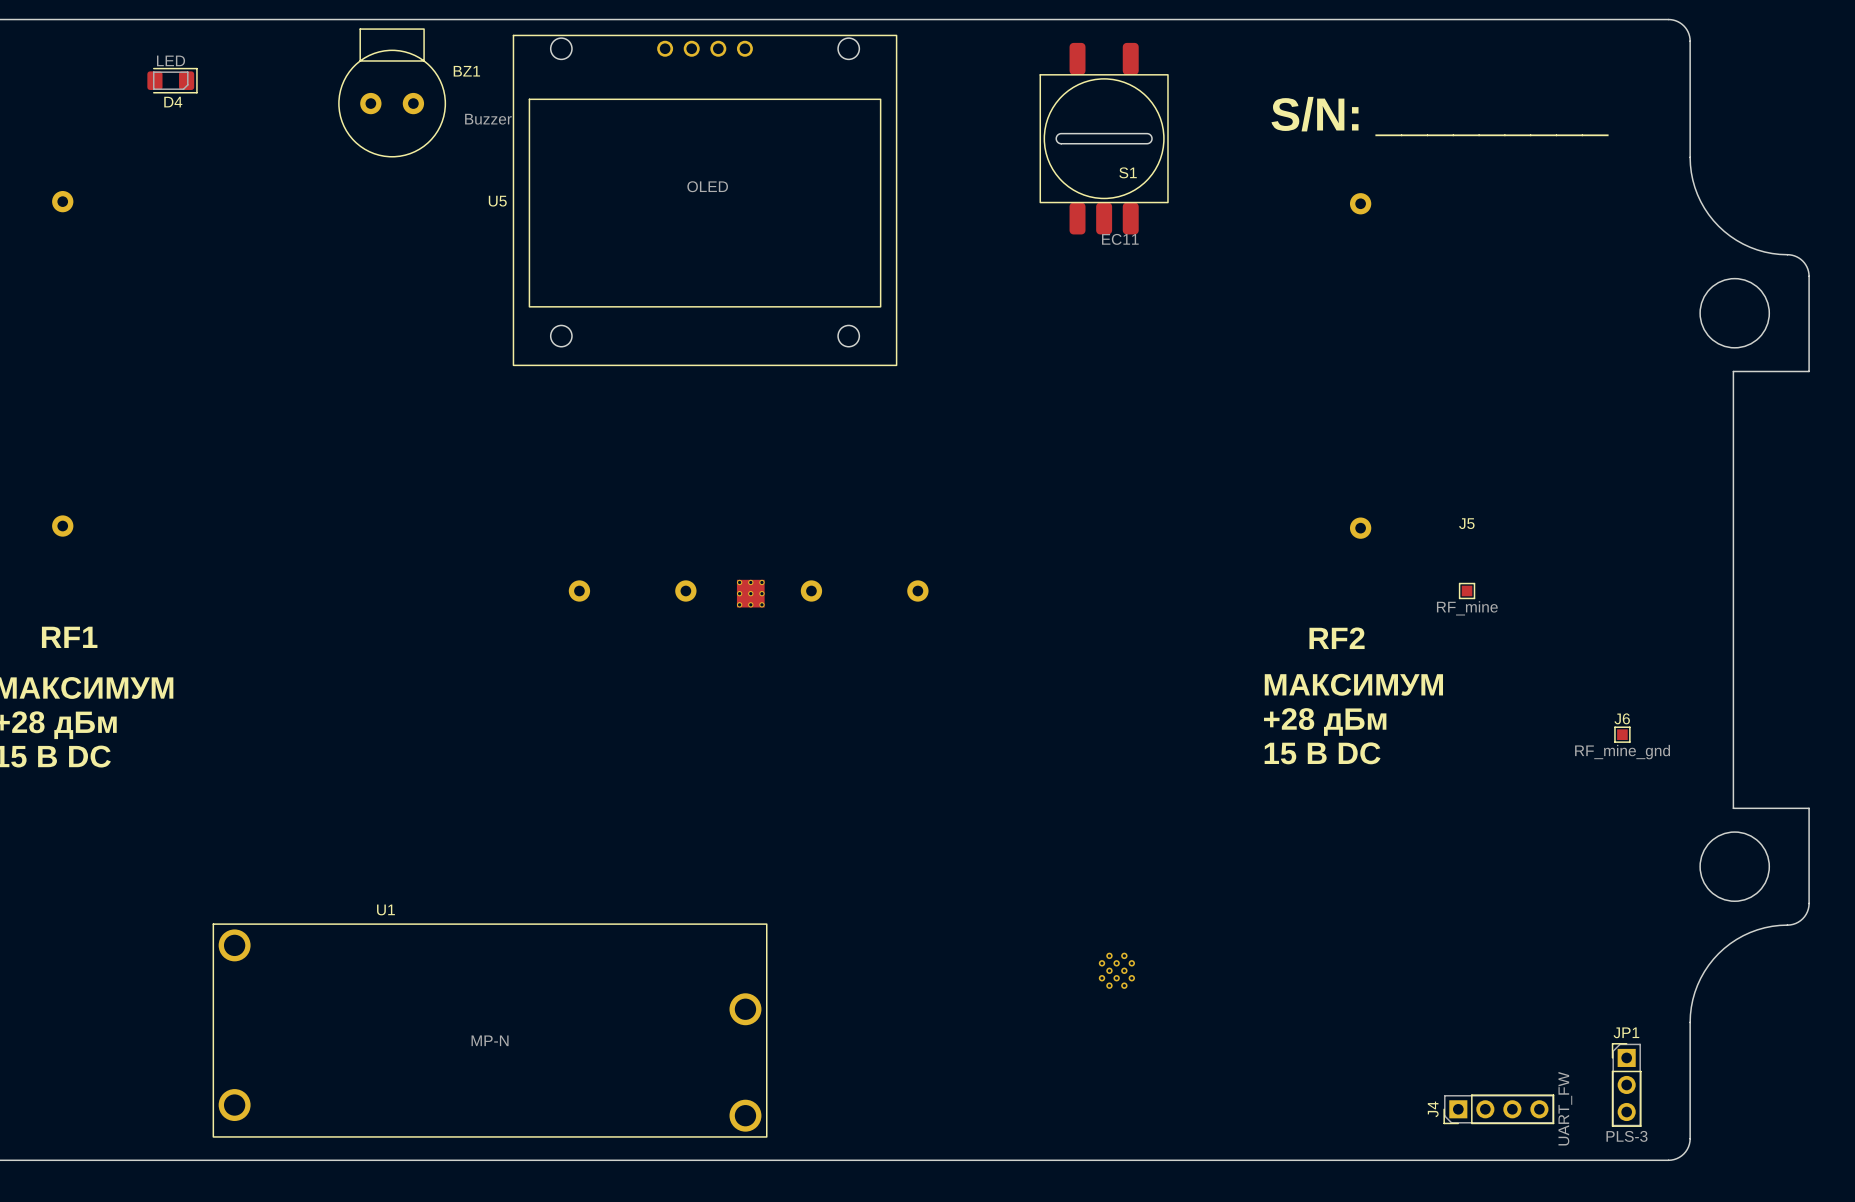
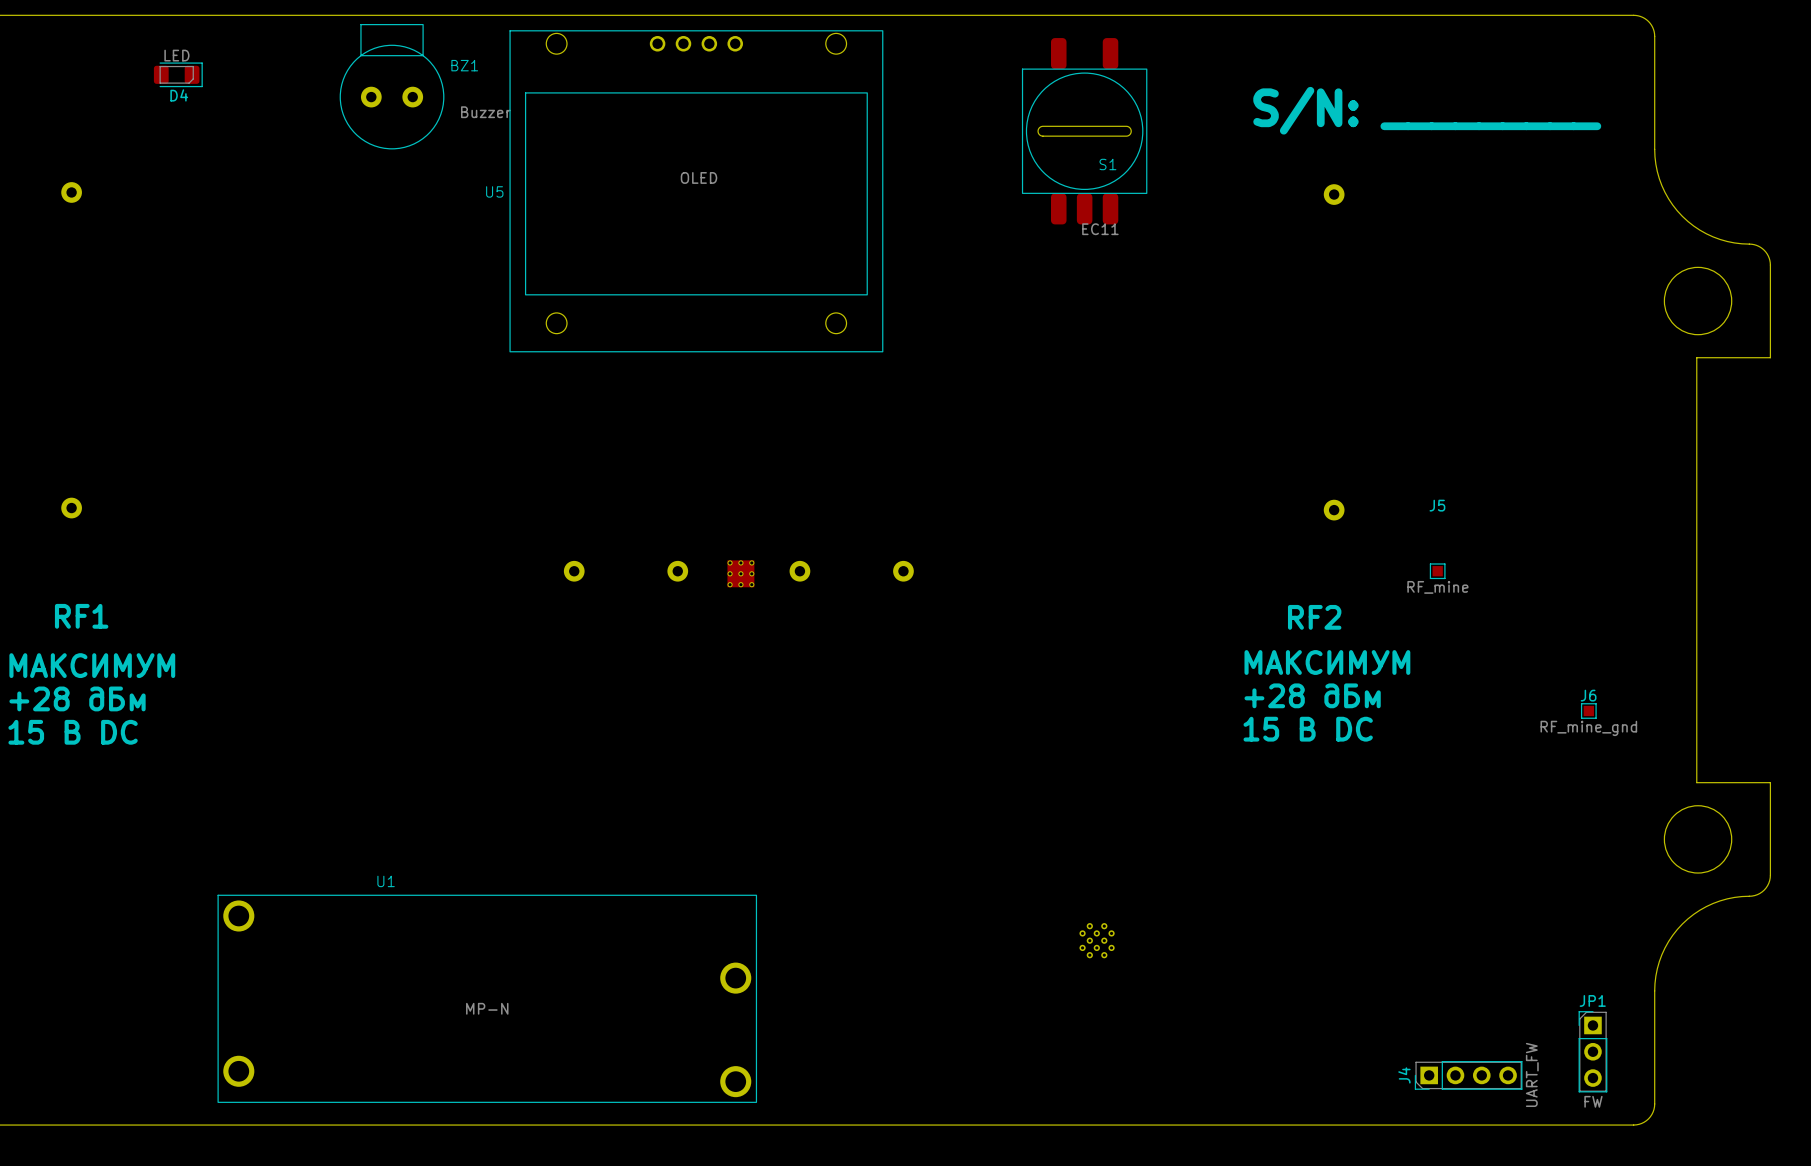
JP1 value: PLS-3 (1626, 1136) -> FW (1593, 1101)

